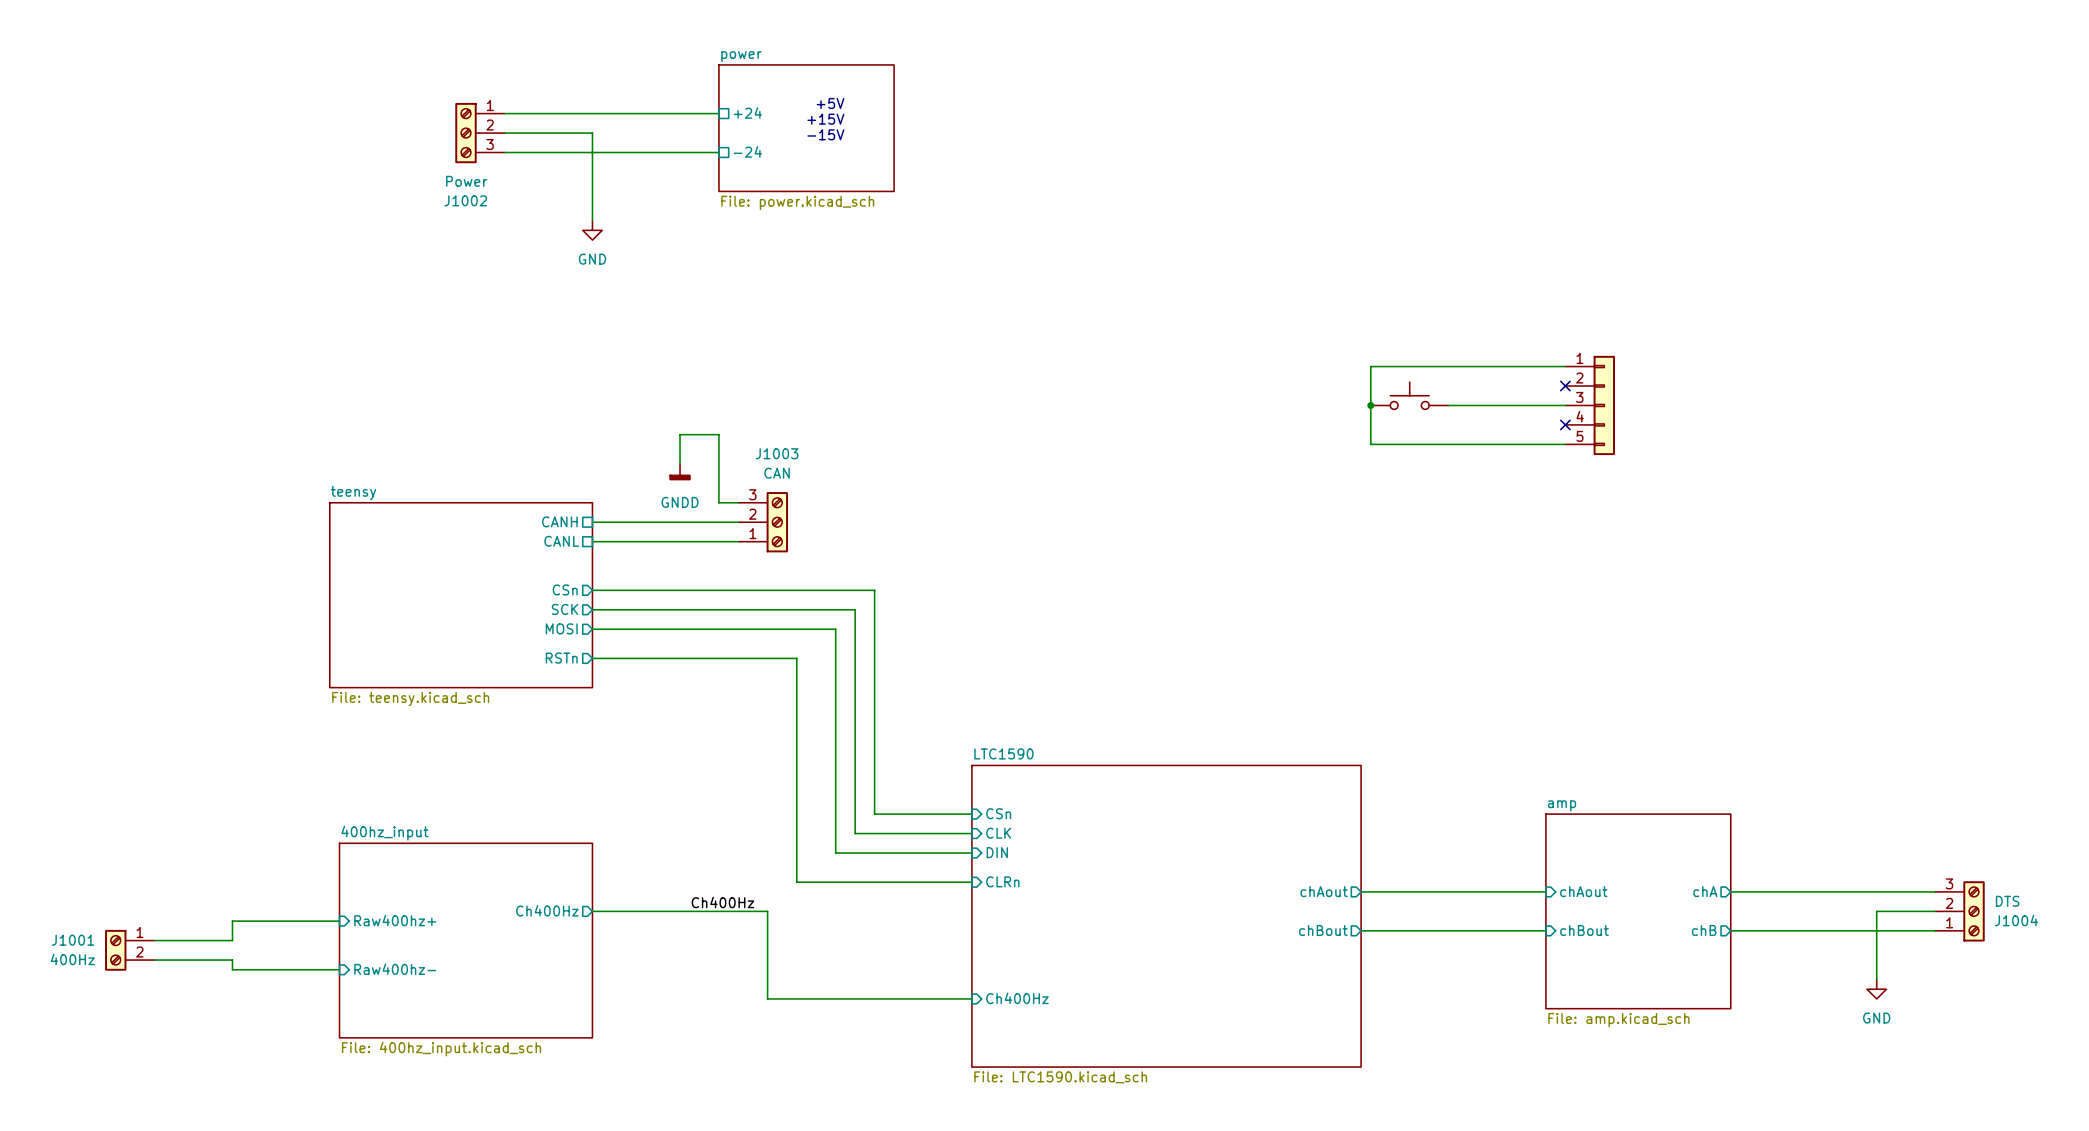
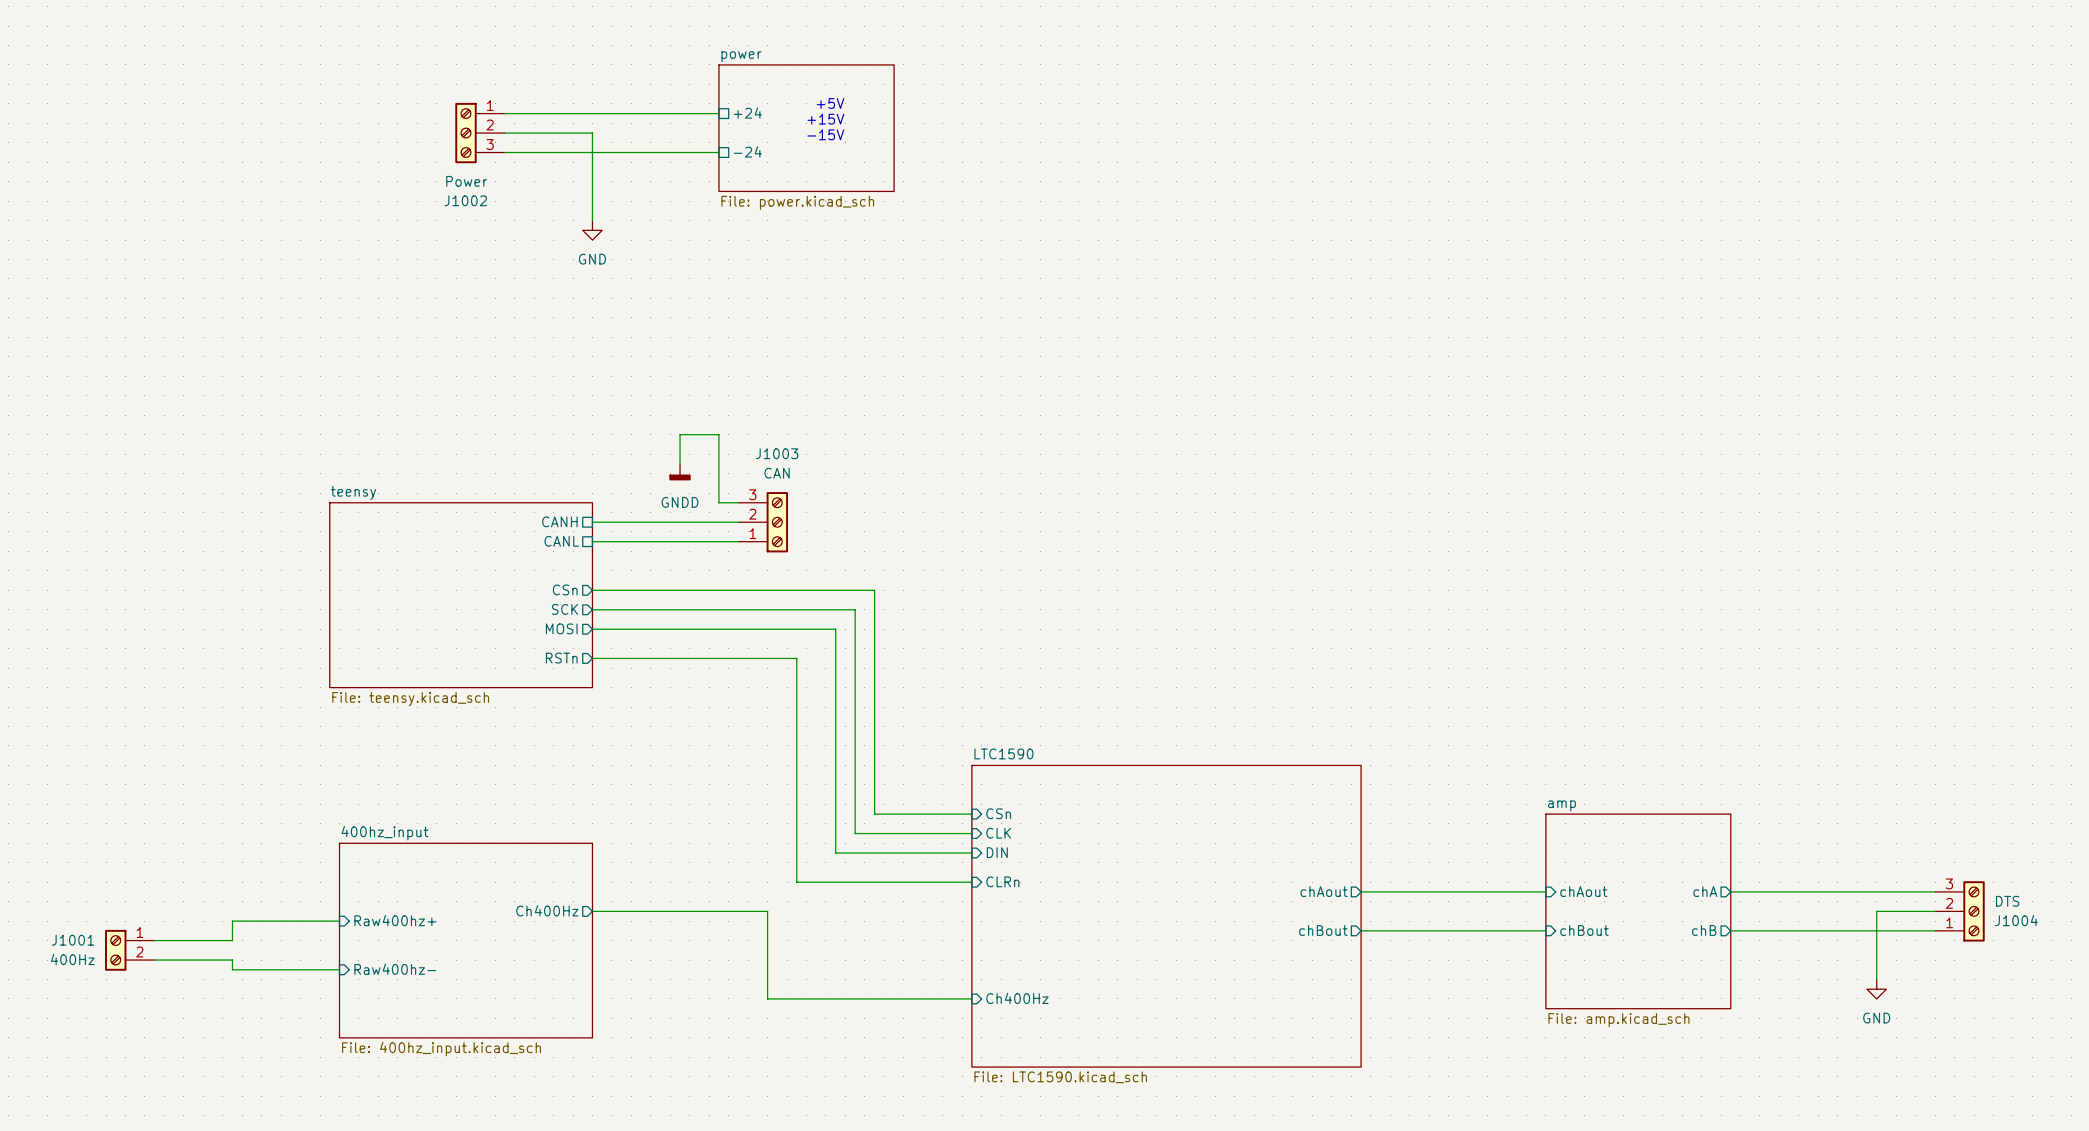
wire: (1565, 366) (1370, 366) (1370, 444) (1565, 444) -> none
no-connect mark: (1565, 386) -> none
part: (1409, 395) -> none
junction: (1370, 405) -> none
wire: (1448, 405) (1565, 405) -> none
part: (1590, 405) -> none
no-connect mark: (1565, 424) -> none
label: Ch400Hz (722, 902) -> none

